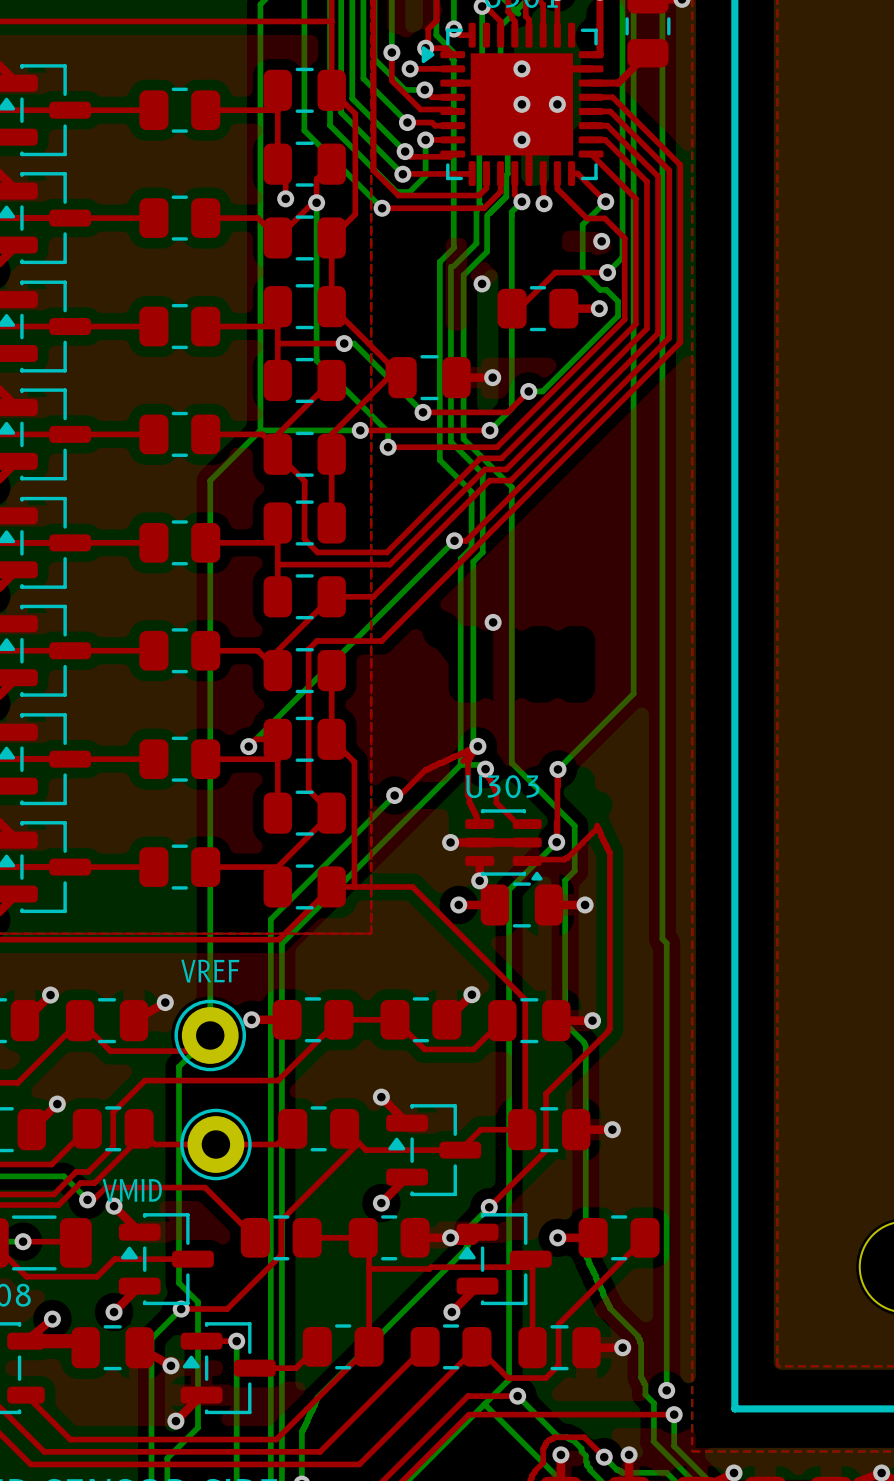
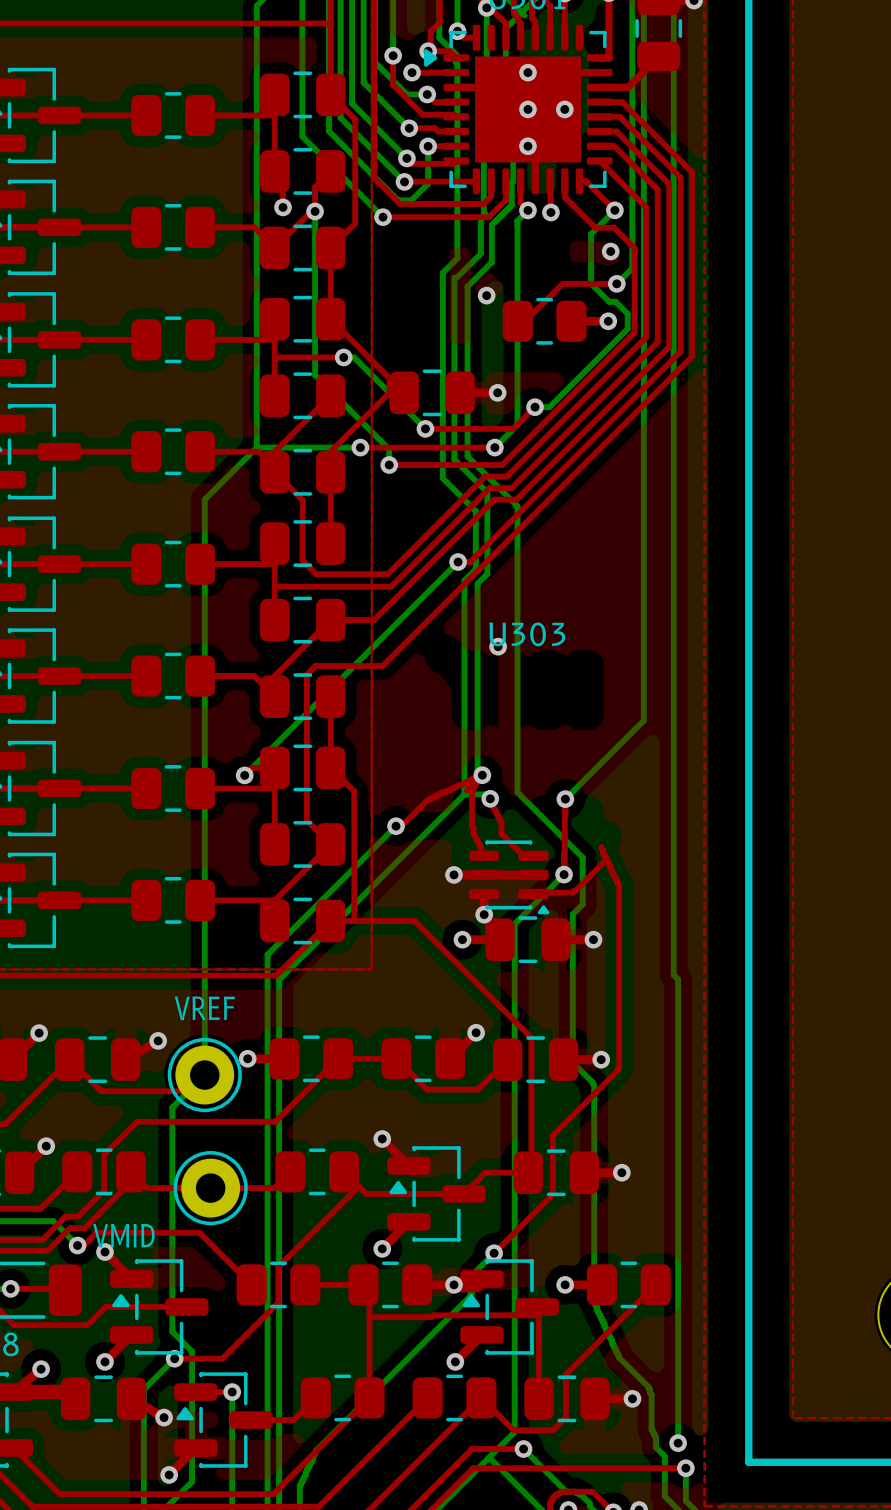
text position: U303 (502, 786) -> U303 (527, 634)
top track: none -> (601, 846) (606, 857)

